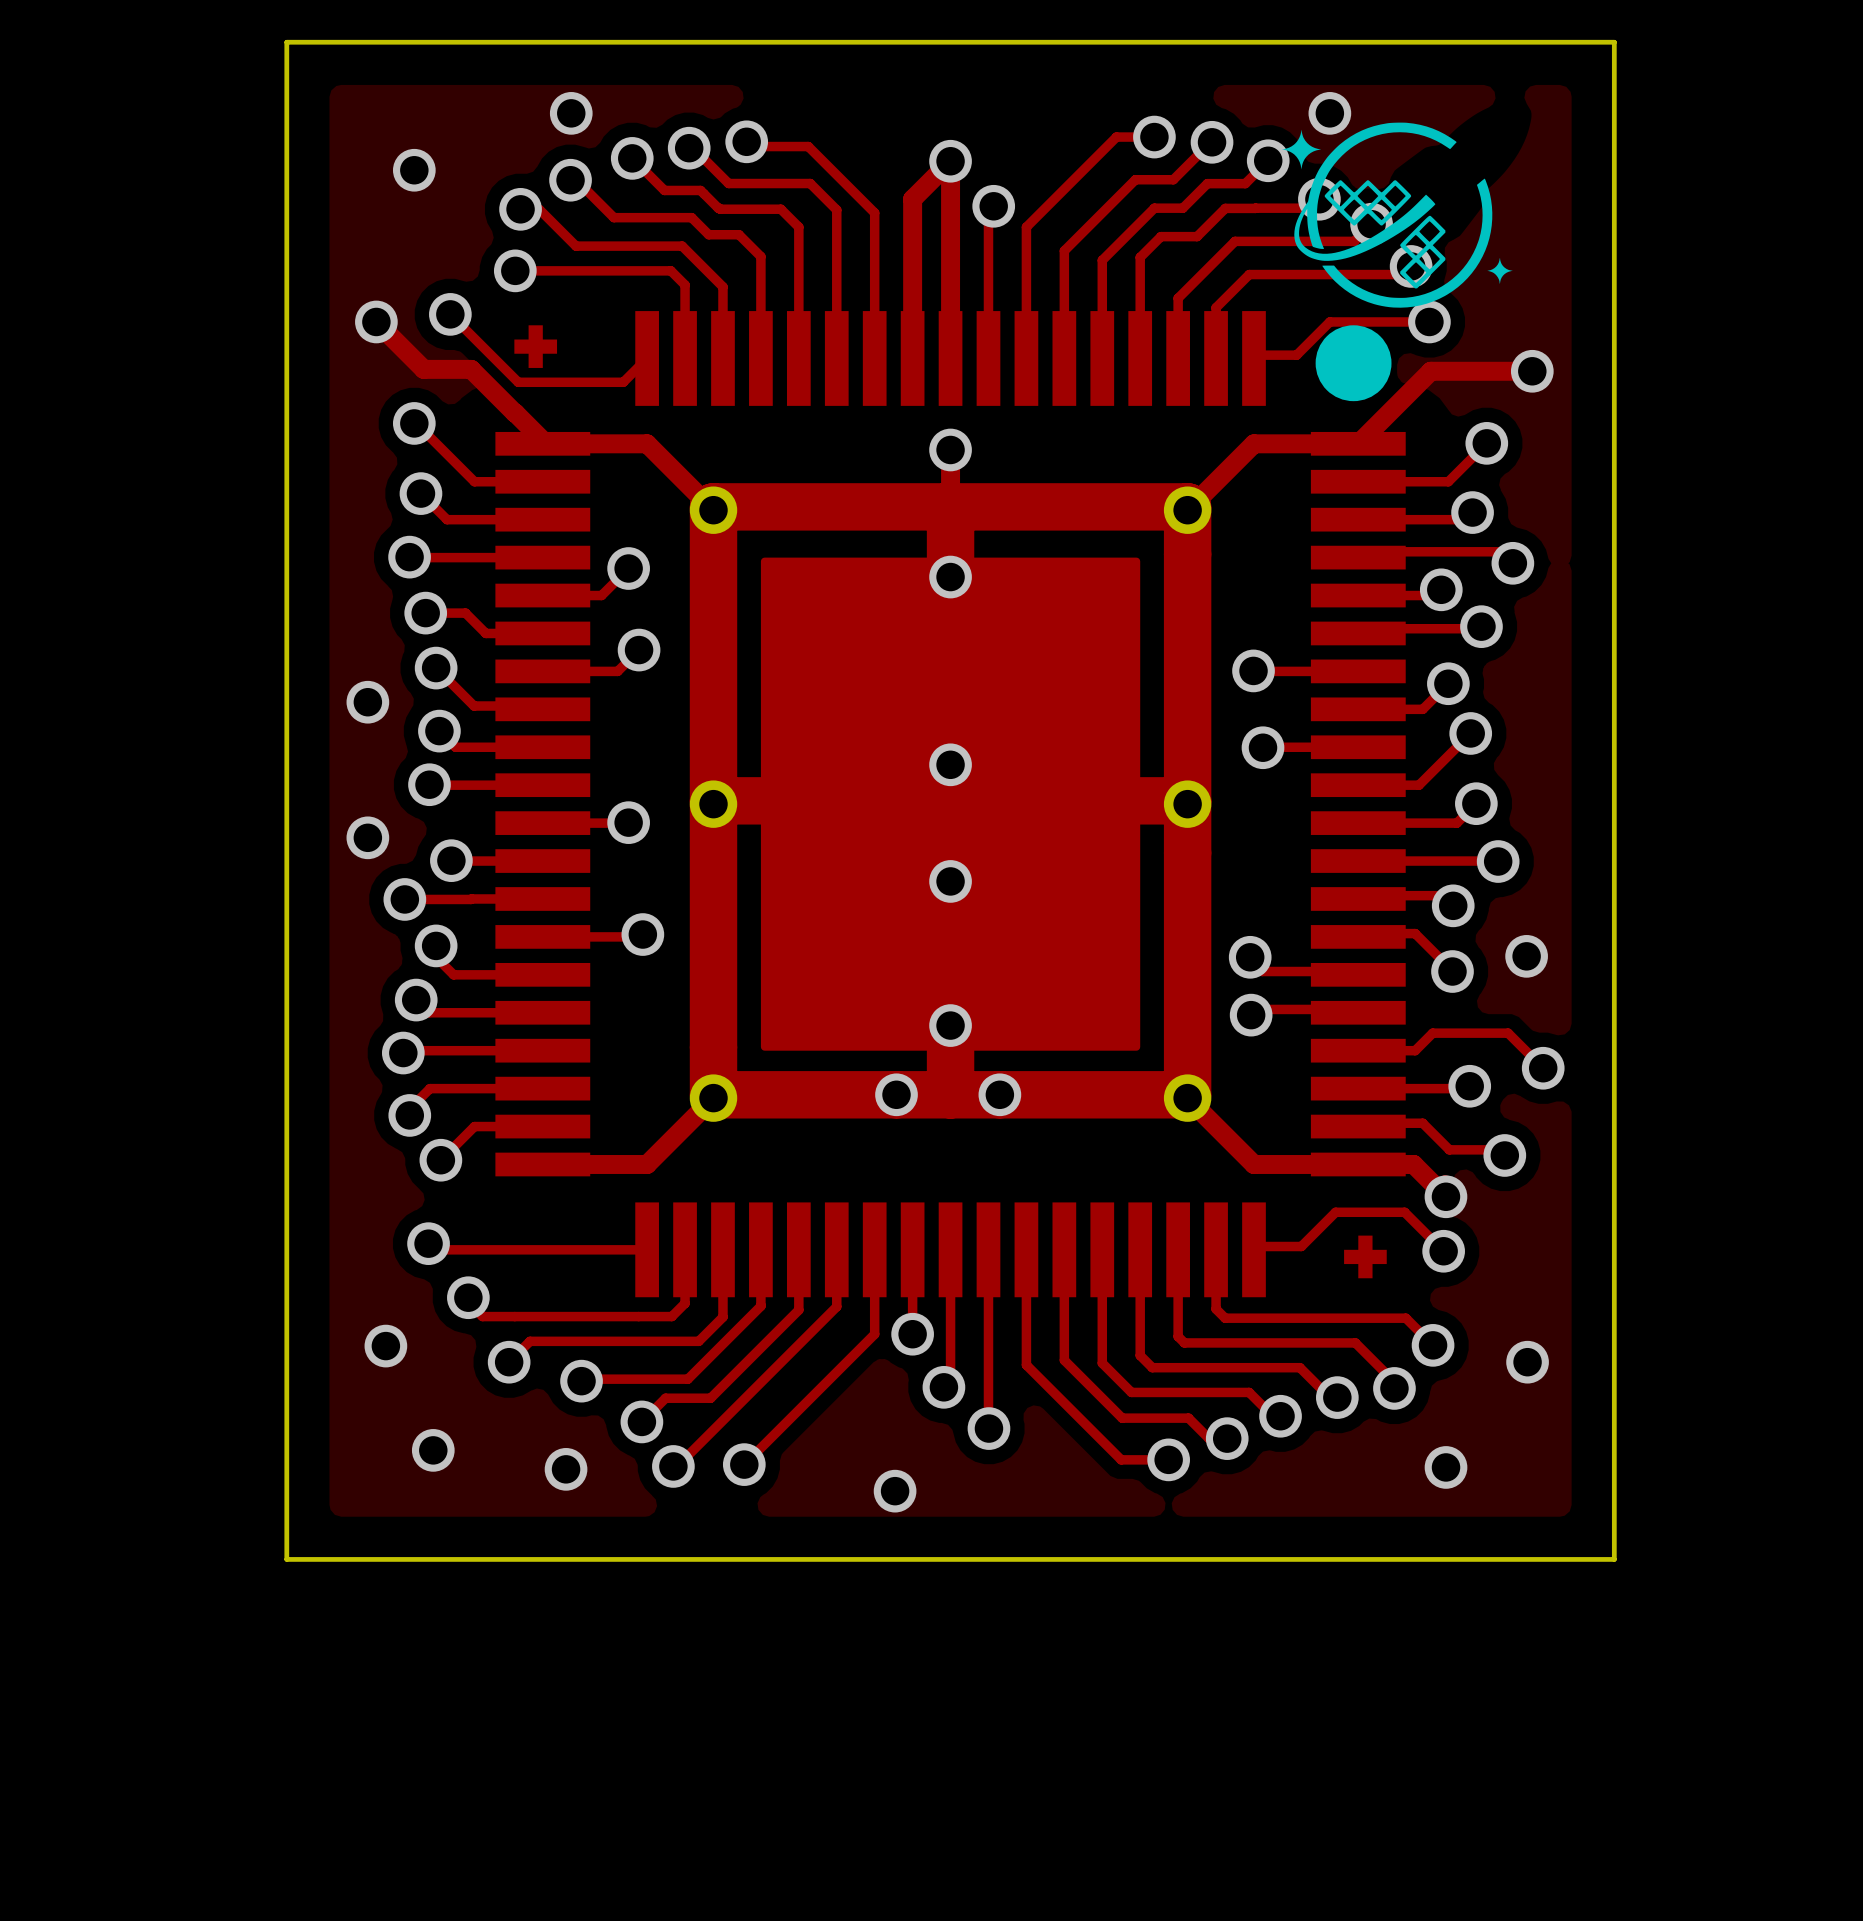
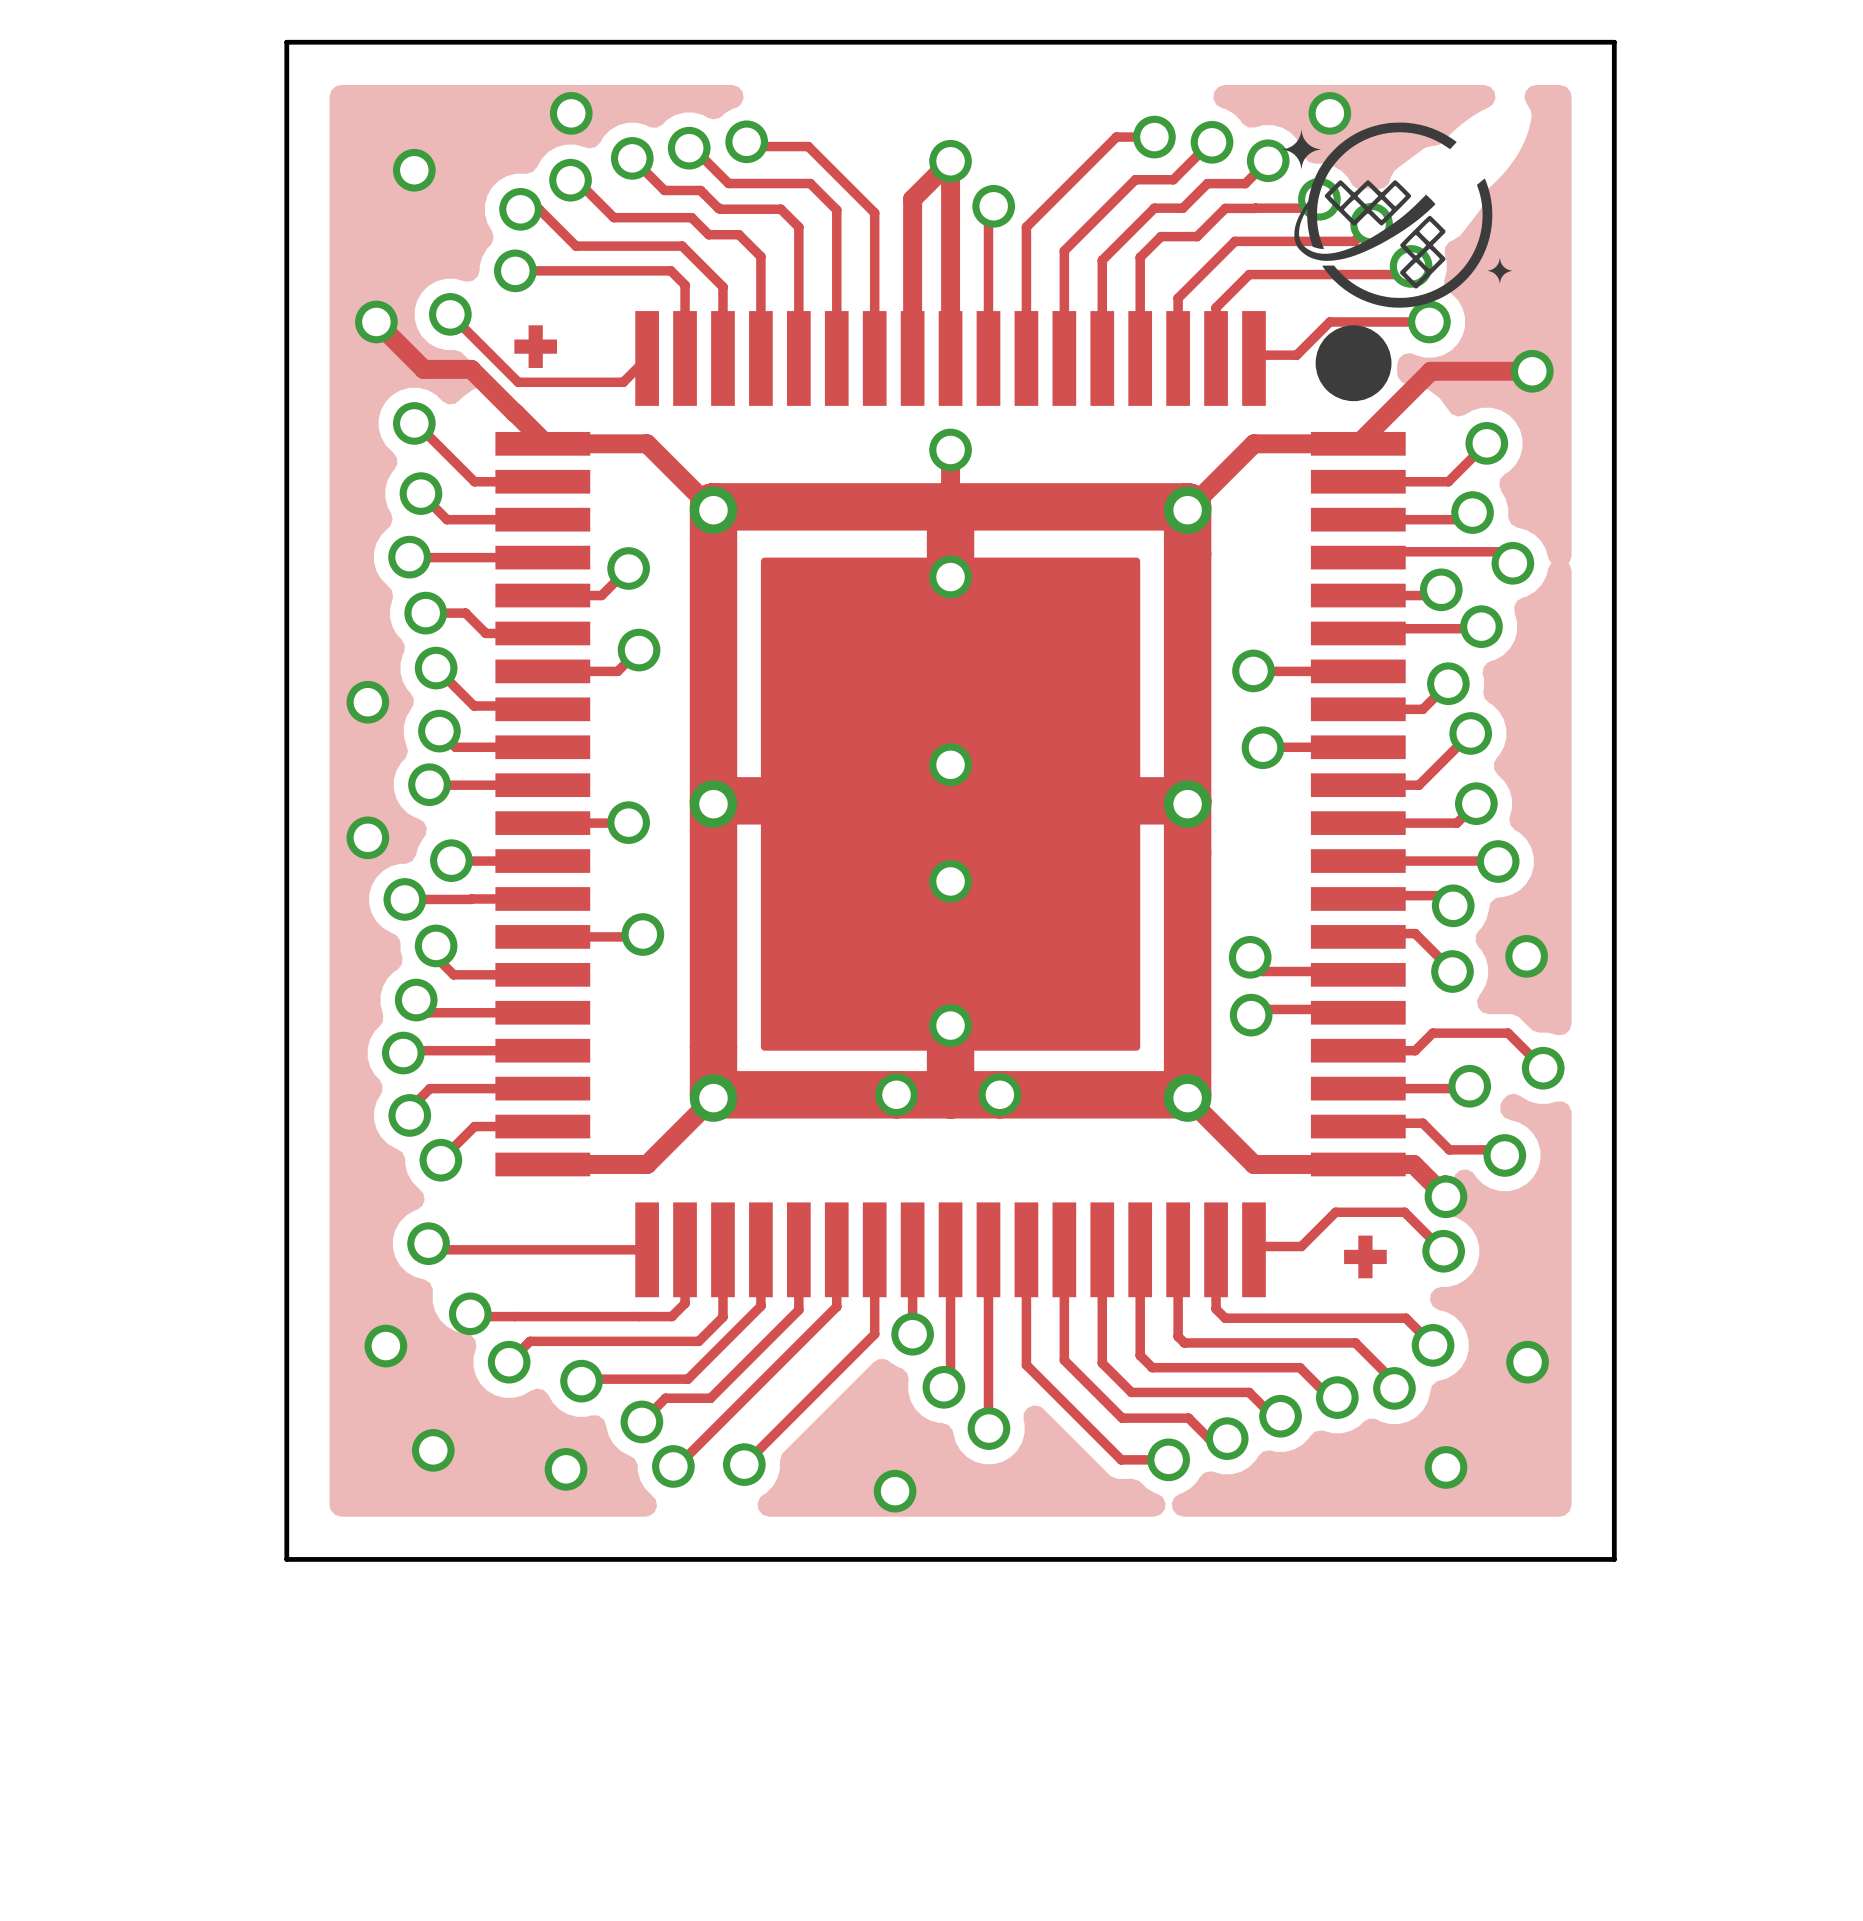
via position: (468, 1297) -> (470, 1313)

